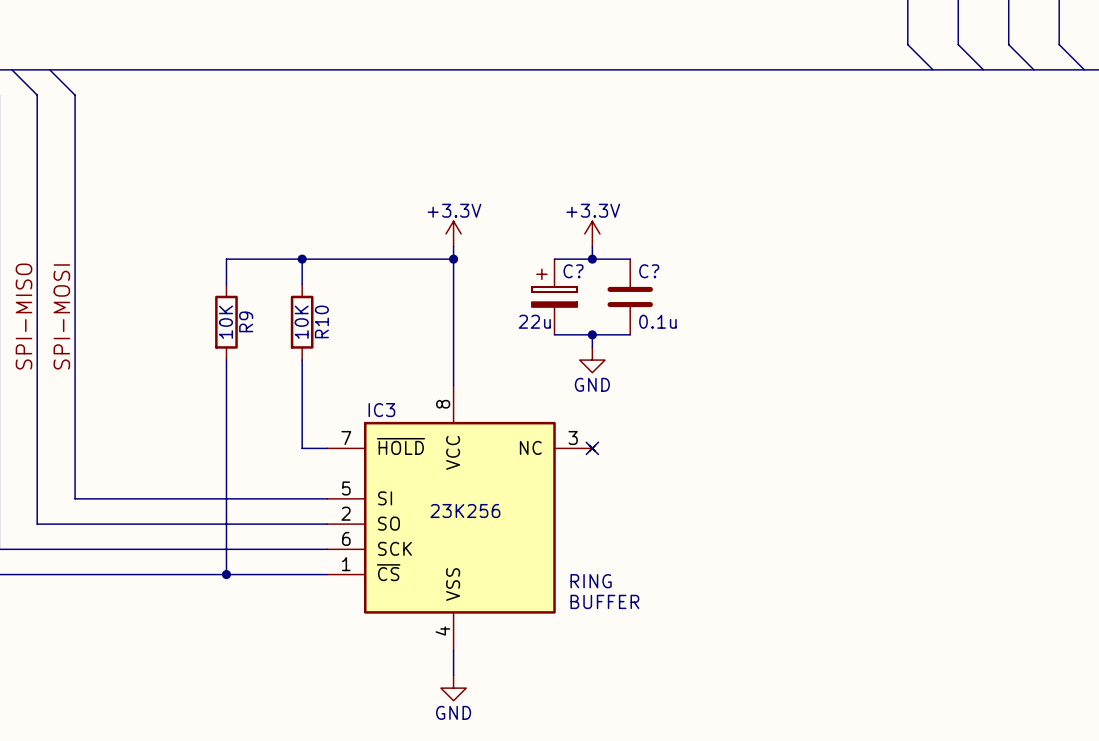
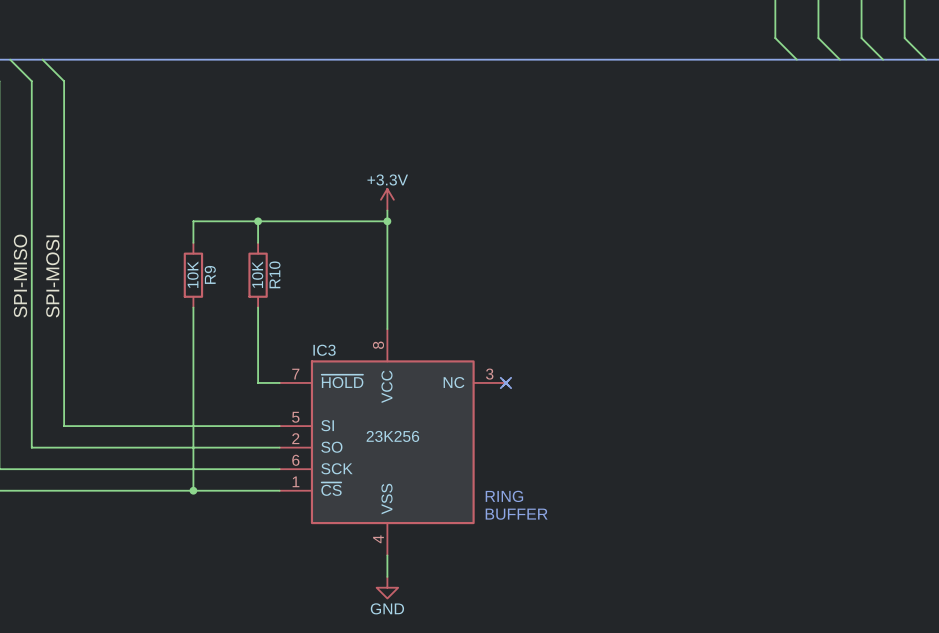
power symbol: +3.3V (592, 233) -> none
wire: (592, 246) (592, 259) -> none
wire: (554, 259) (630, 259) -> none
junction: (592, 259) -> none
C?: 22u (554, 296) -> none
C?: 0.1u (630, 296) -> none
wire: (554, 334) (630, 334) -> none
wire: (592, 334) (592, 347) -> none
junction: (592, 334) -> none
power symbol: GND (592, 360) -> none

